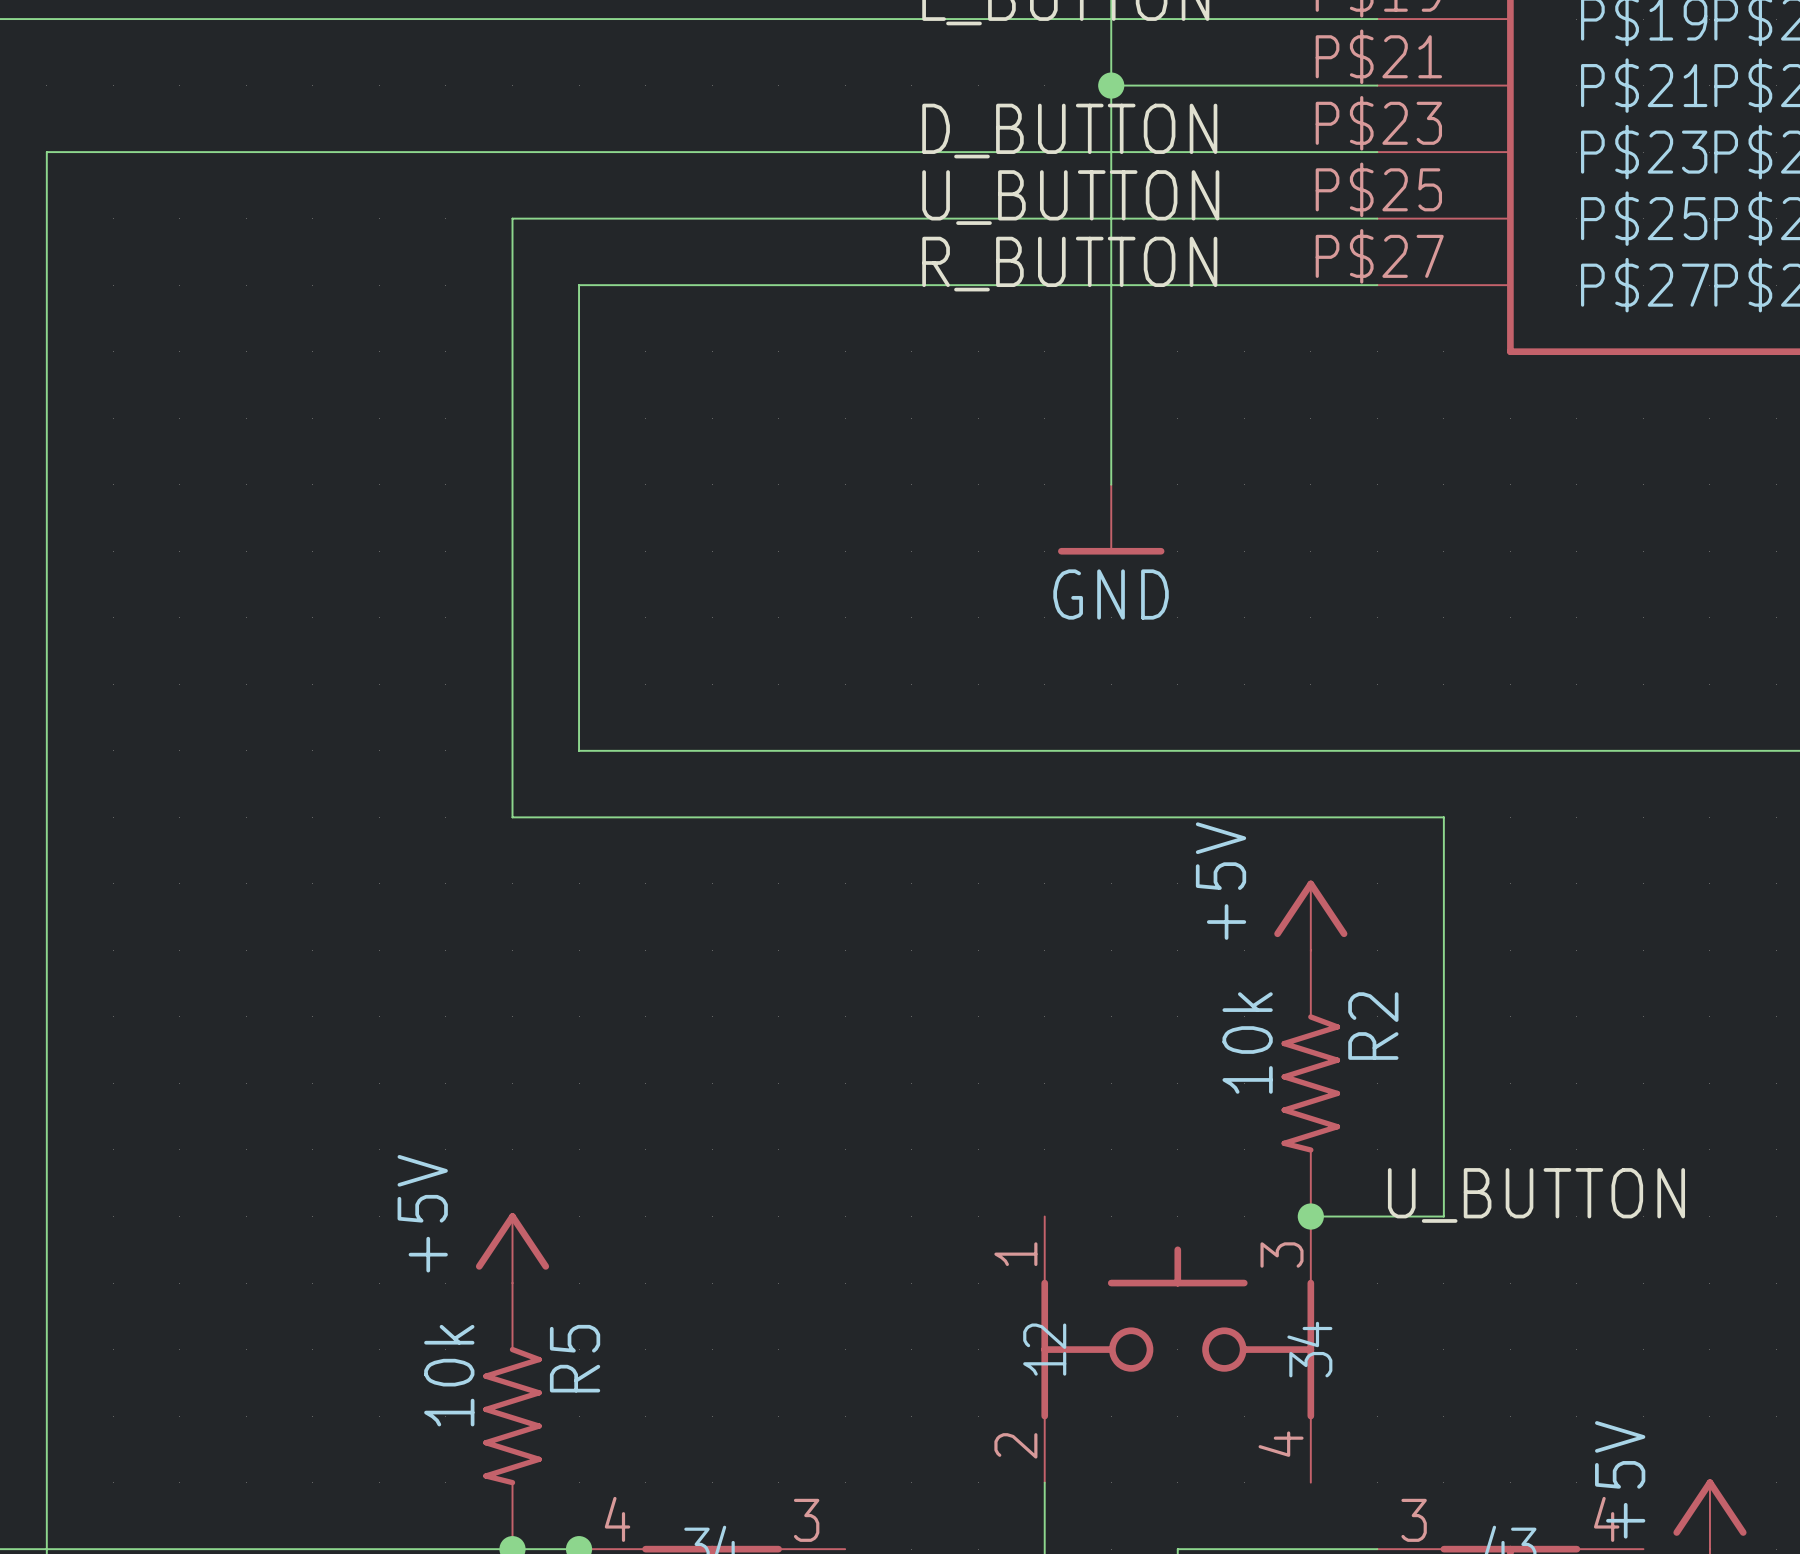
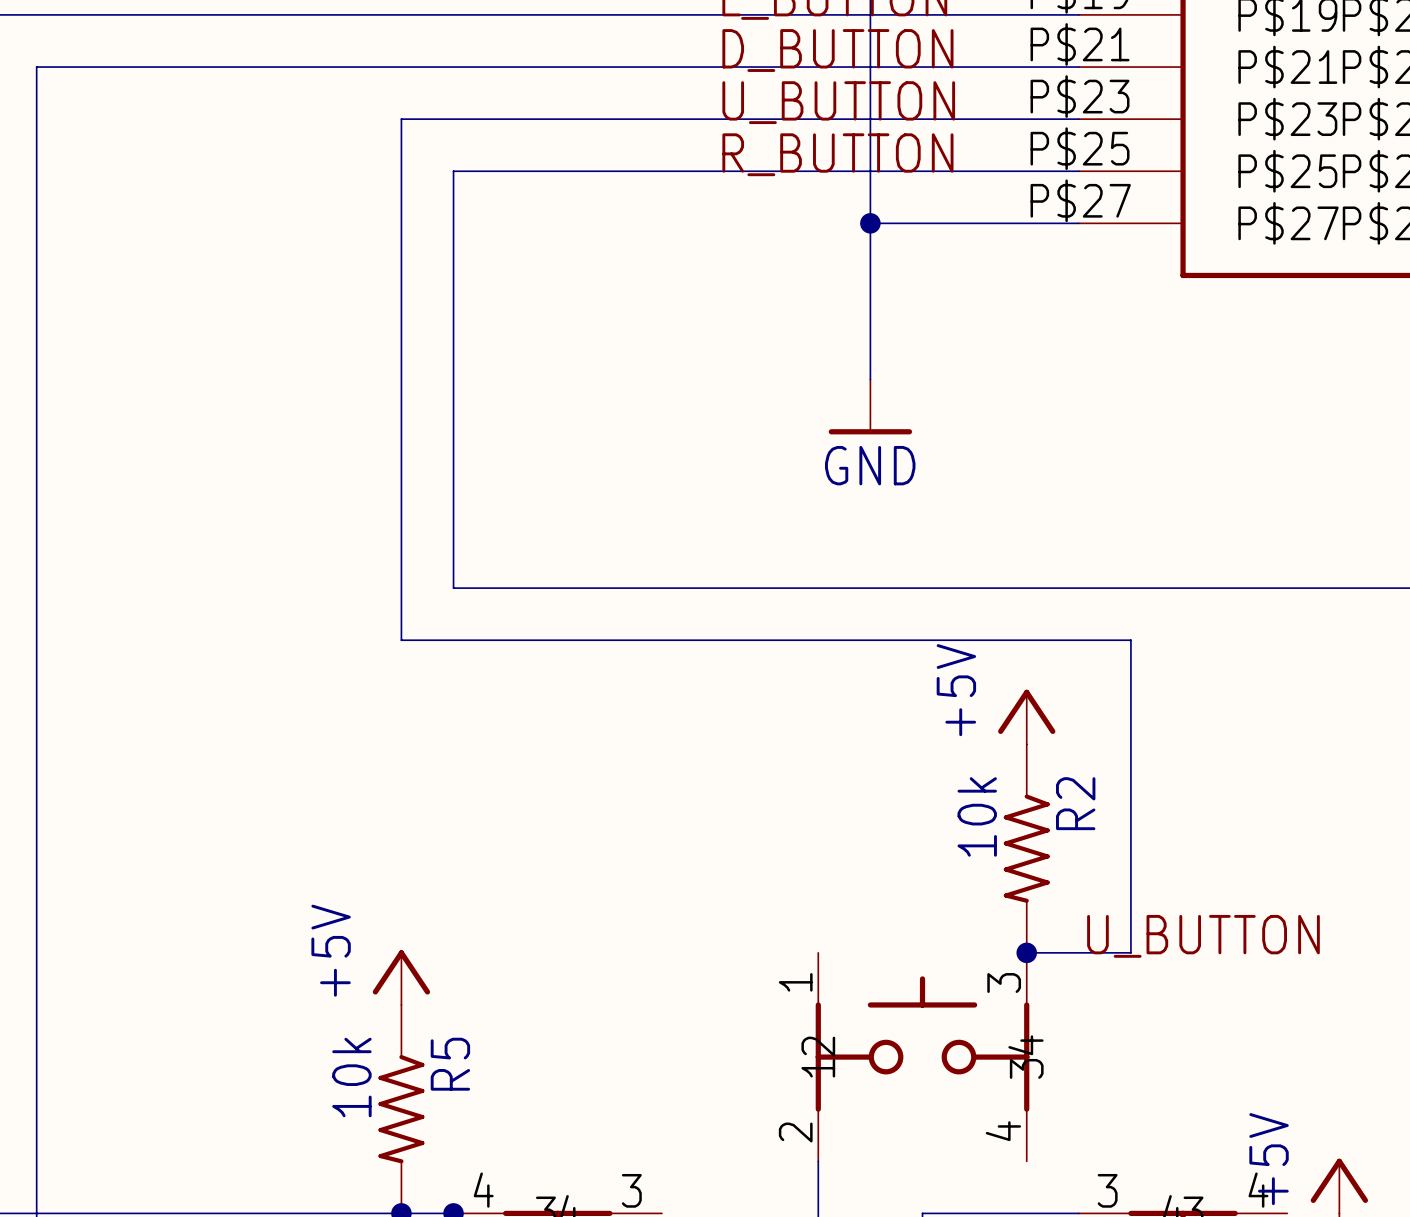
label: none -> D_BUTTON (837, 50)
junction: (1111, 85) -> none
label: D_BUTTON (1069, 131) -> U_BUTTON (838, 102)
wire: (46, 152) (512, 152) -> (36, 119) (36, 67) (870, 67)
label: U_BUTTON (1070, 197) -> R_BUTTON (837, 154)
wire: (512, 218) (579, 218) -> (401, 171) (401, 119)
label: R_BUTTON (1069, 264) -> none
wire: (579, 285) (1111, 285) -> (453, 223) (453, 171)
junction: none -> (870, 223)

